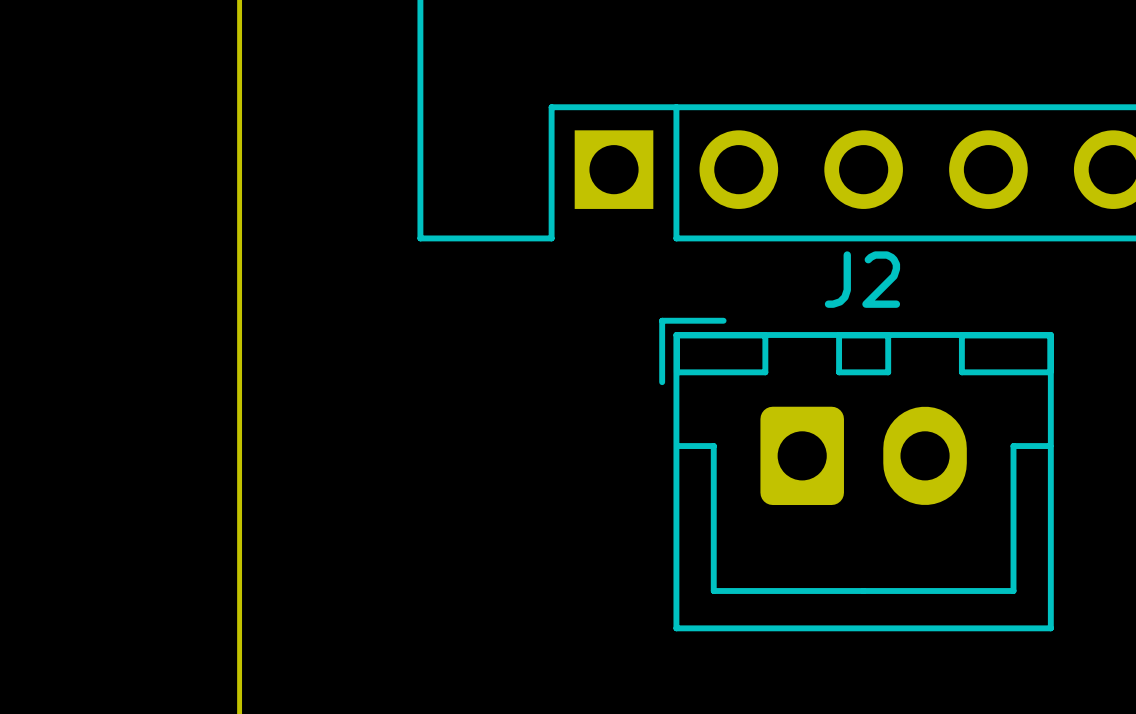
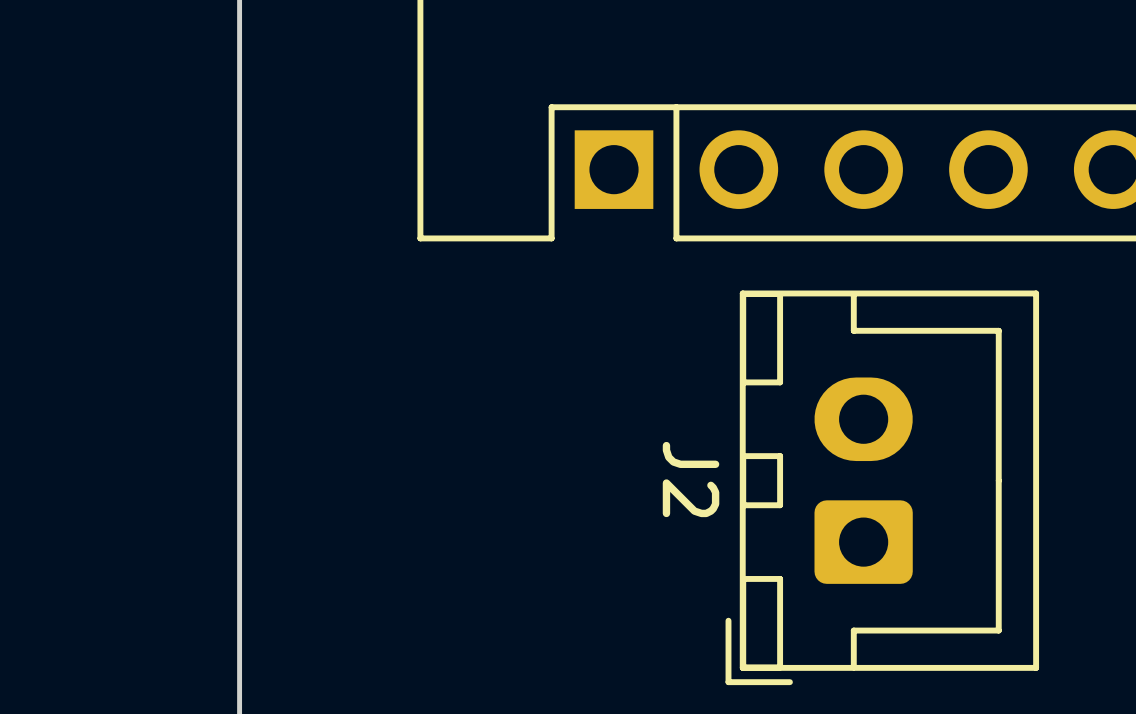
J2 rotation: 0° (856, 474) -> 90° counterclockwise (882, 487)

